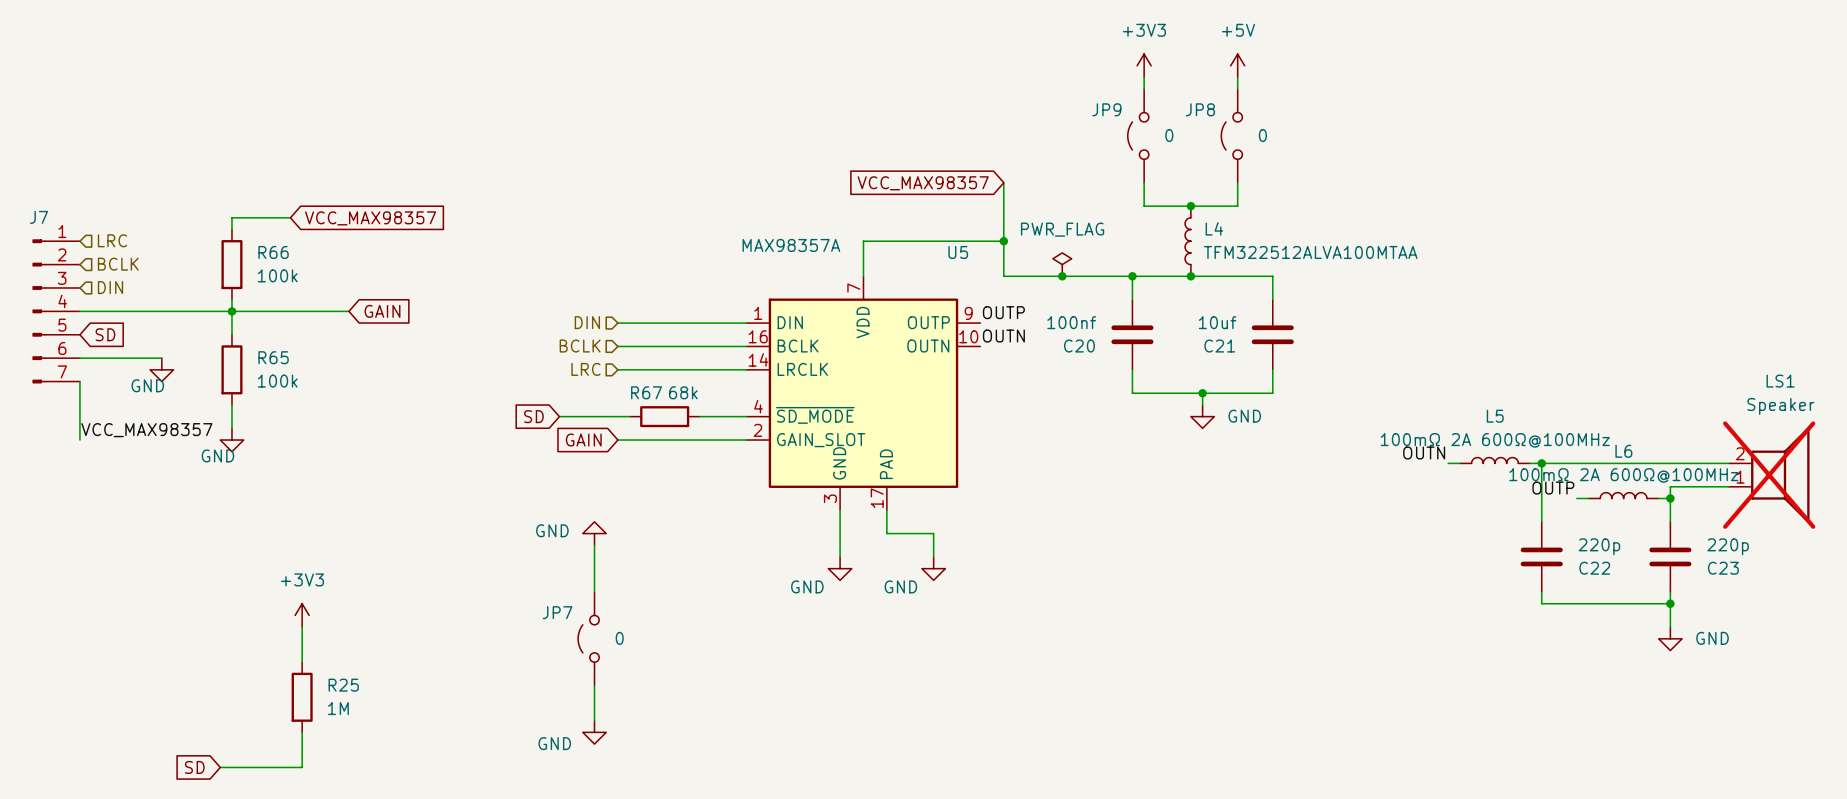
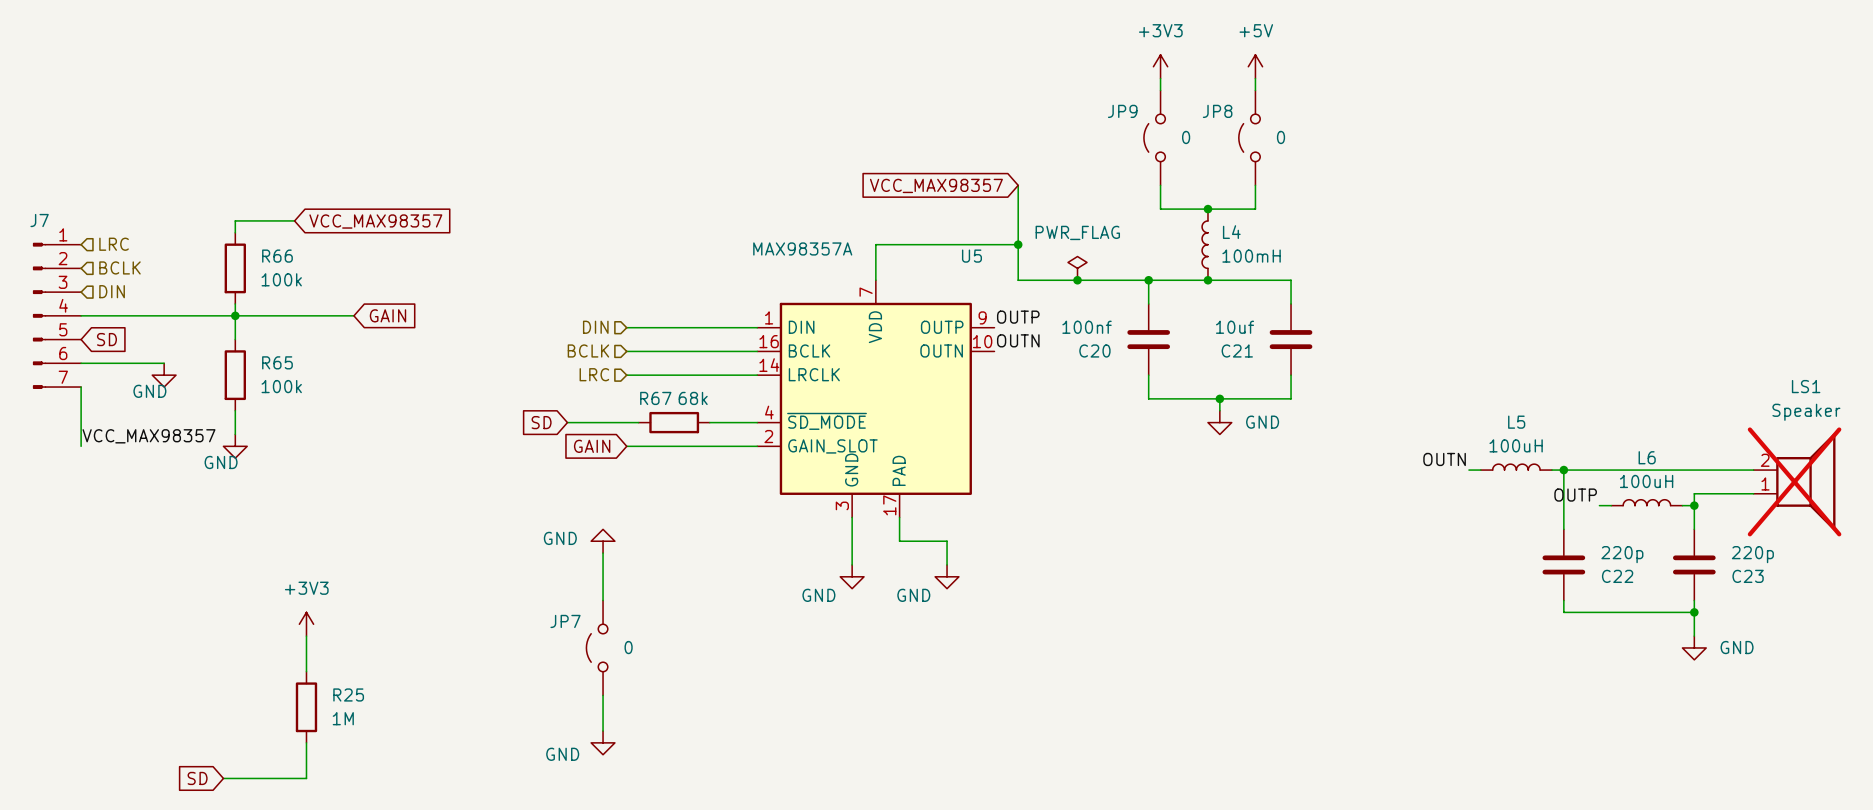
L4 value: TFM322512ALVA100MTAA (1310, 252) -> 100mH (1251, 256)
L5 value: 100mΩ 2A 600Ω@100MHz (1495, 440) -> 100uH (1516, 445)
L6 value: 100mΩ 2A 600Ω@100MHz (1623, 475) -> 100uH (1646, 481)

